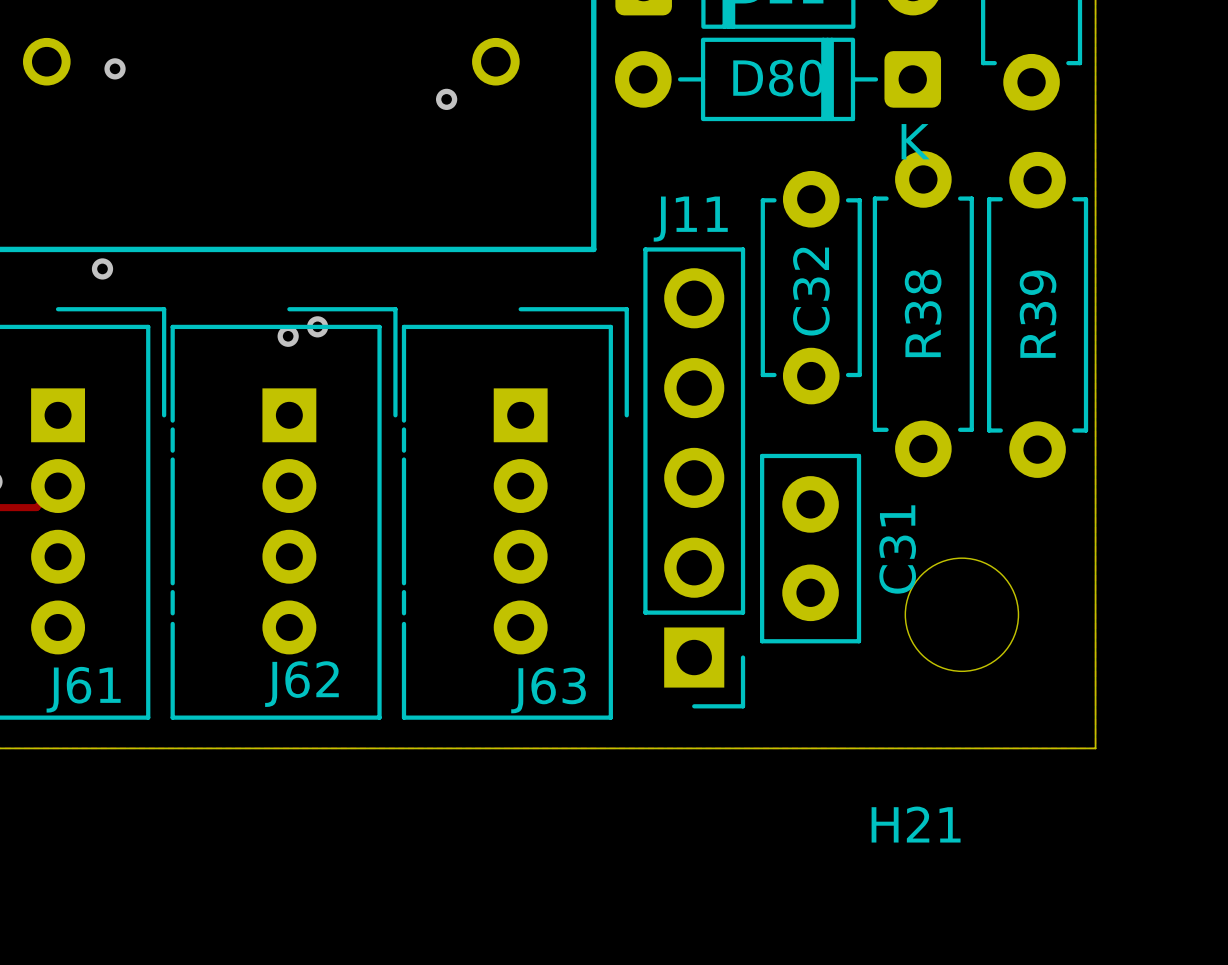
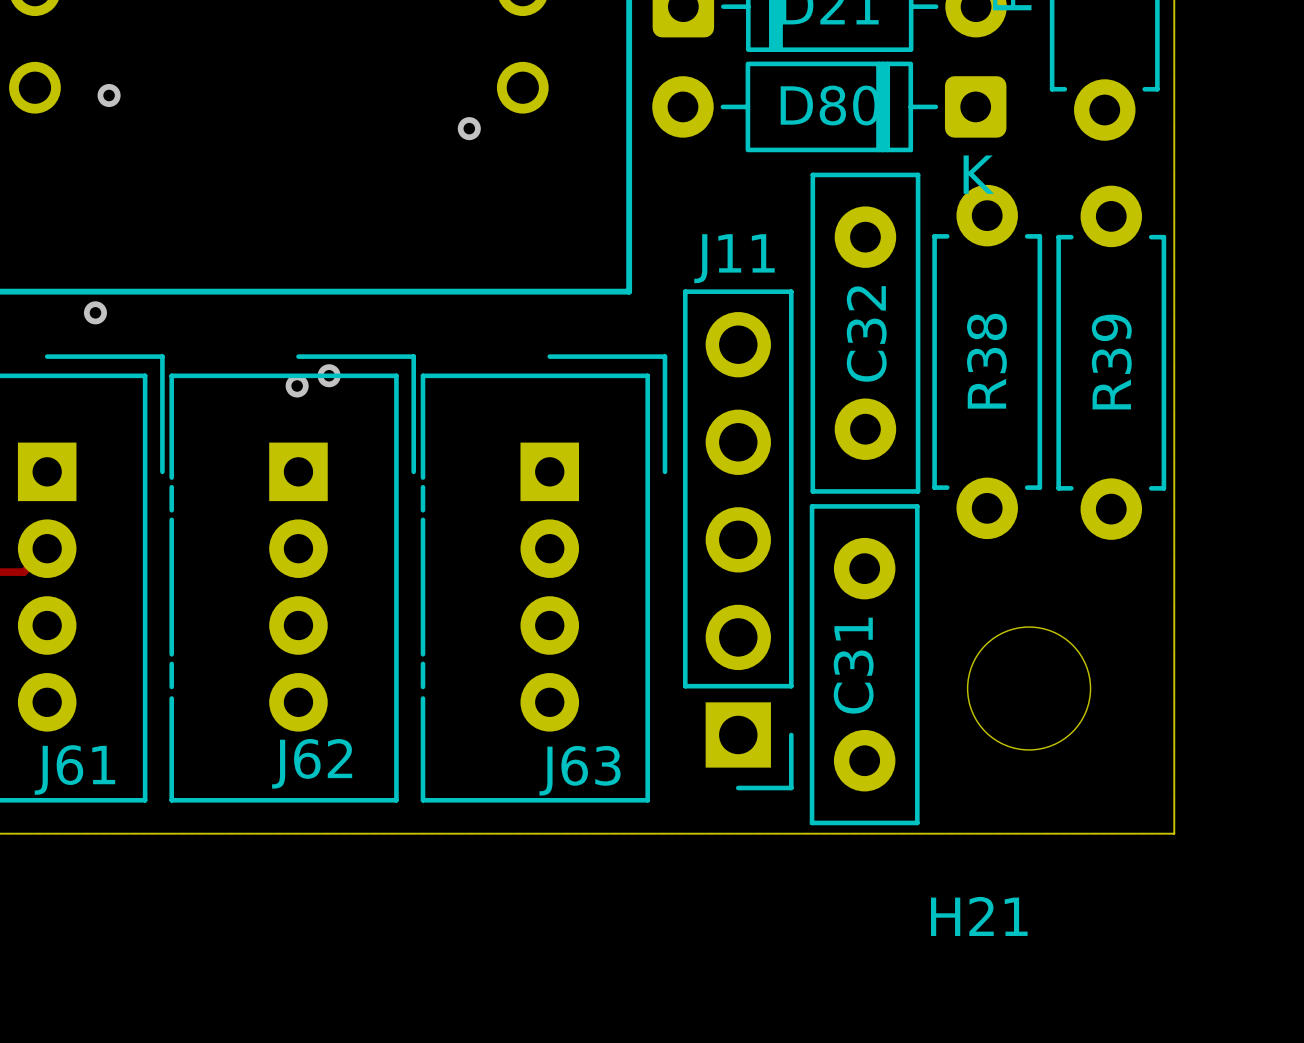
C32 footprint: [760, 170, 862, 405] -> [810, 172, 921, 494]
C31 footprint: [760, 453, 862, 644] -> [809, 504, 920, 826]
C31 name position: C31 (897, 549) -> C31 (853, 665)

